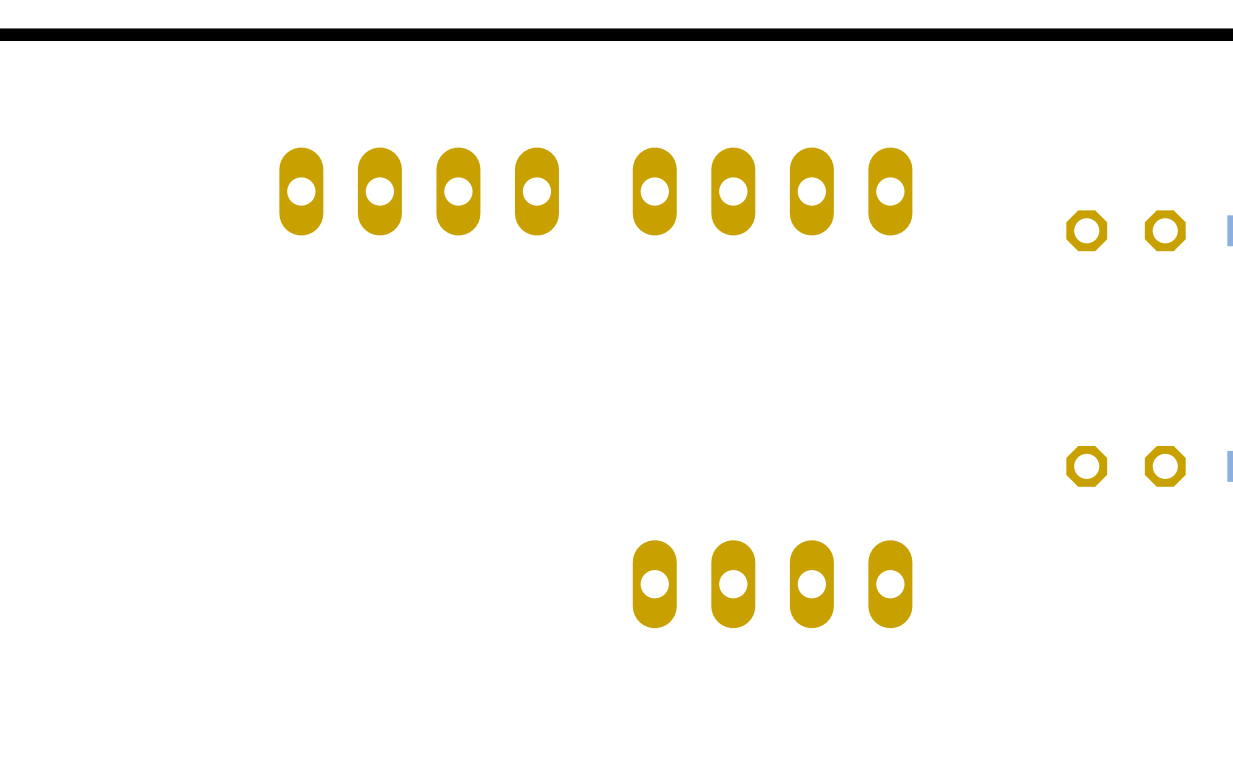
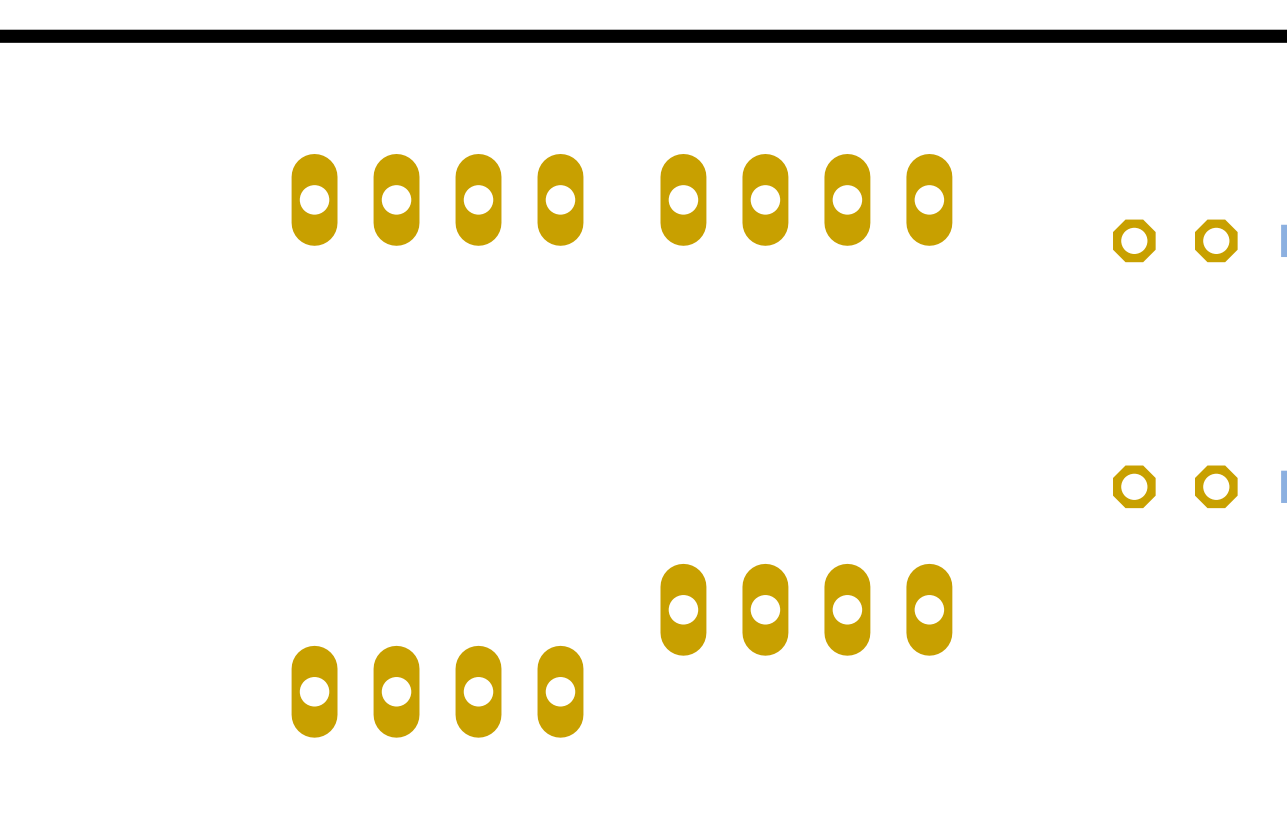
part: none -> (437, 691)

